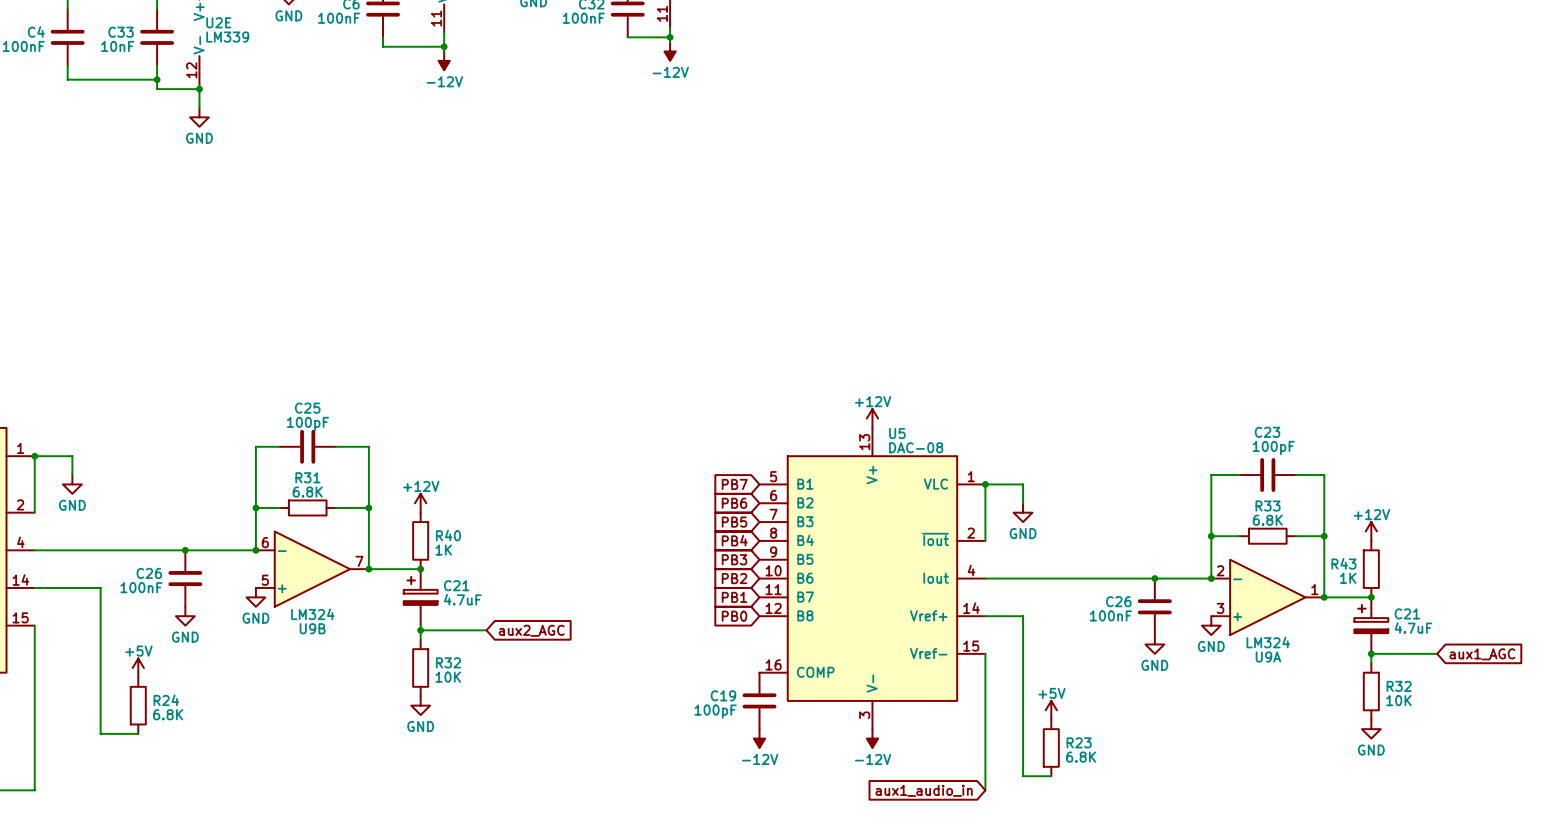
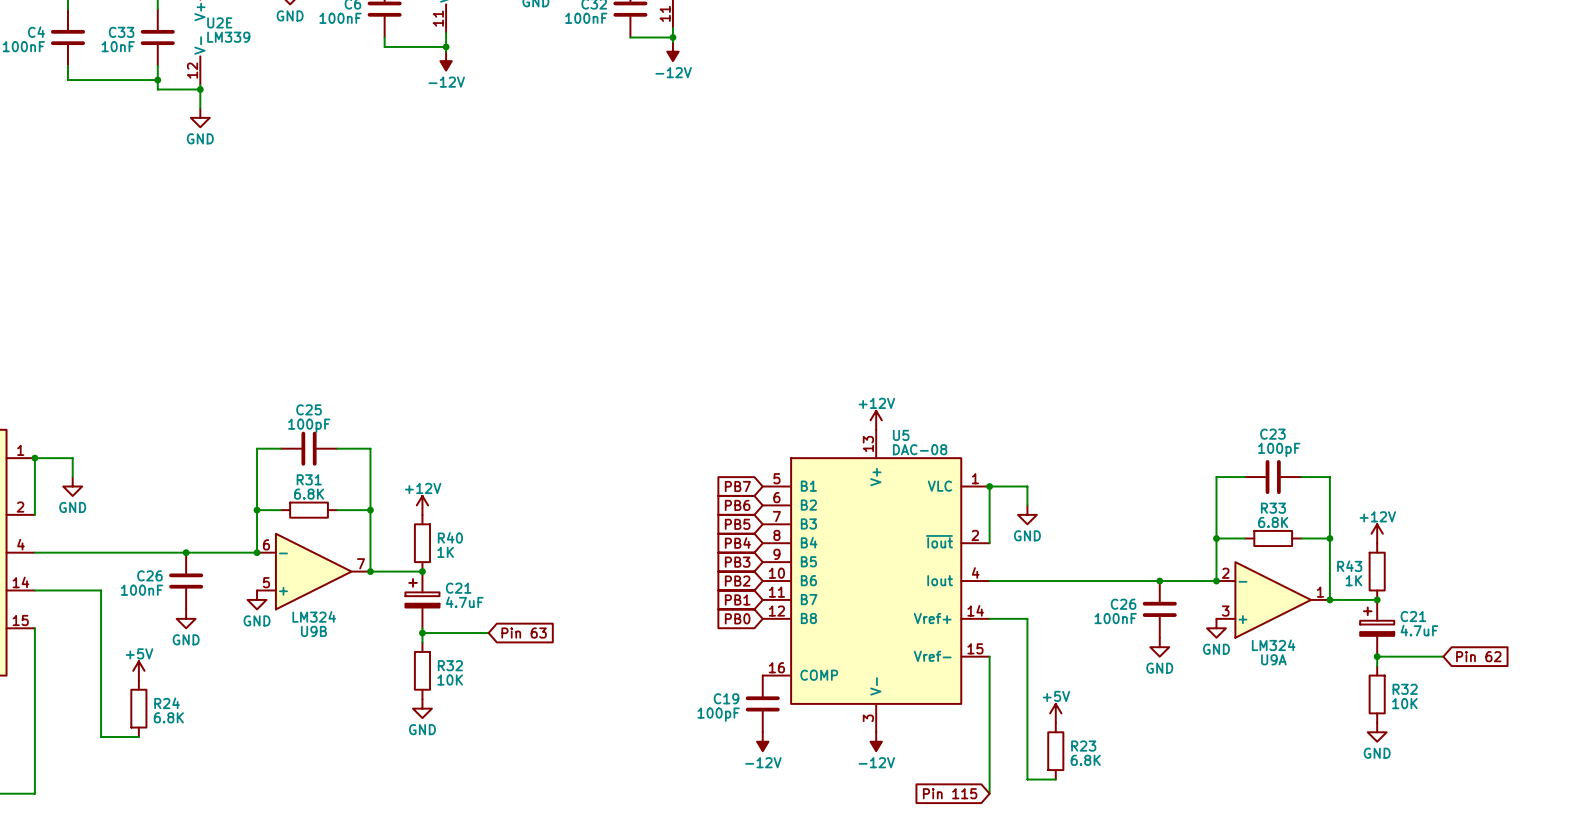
global label: aux2_AGC (531, 630) -> Pin 63 (524, 633)
global label: aux1_AGC (1482, 654) -> Pin 62 (1478, 656)
global label: aux1_audio_in (924, 790) -> Pin 115 (950, 793)

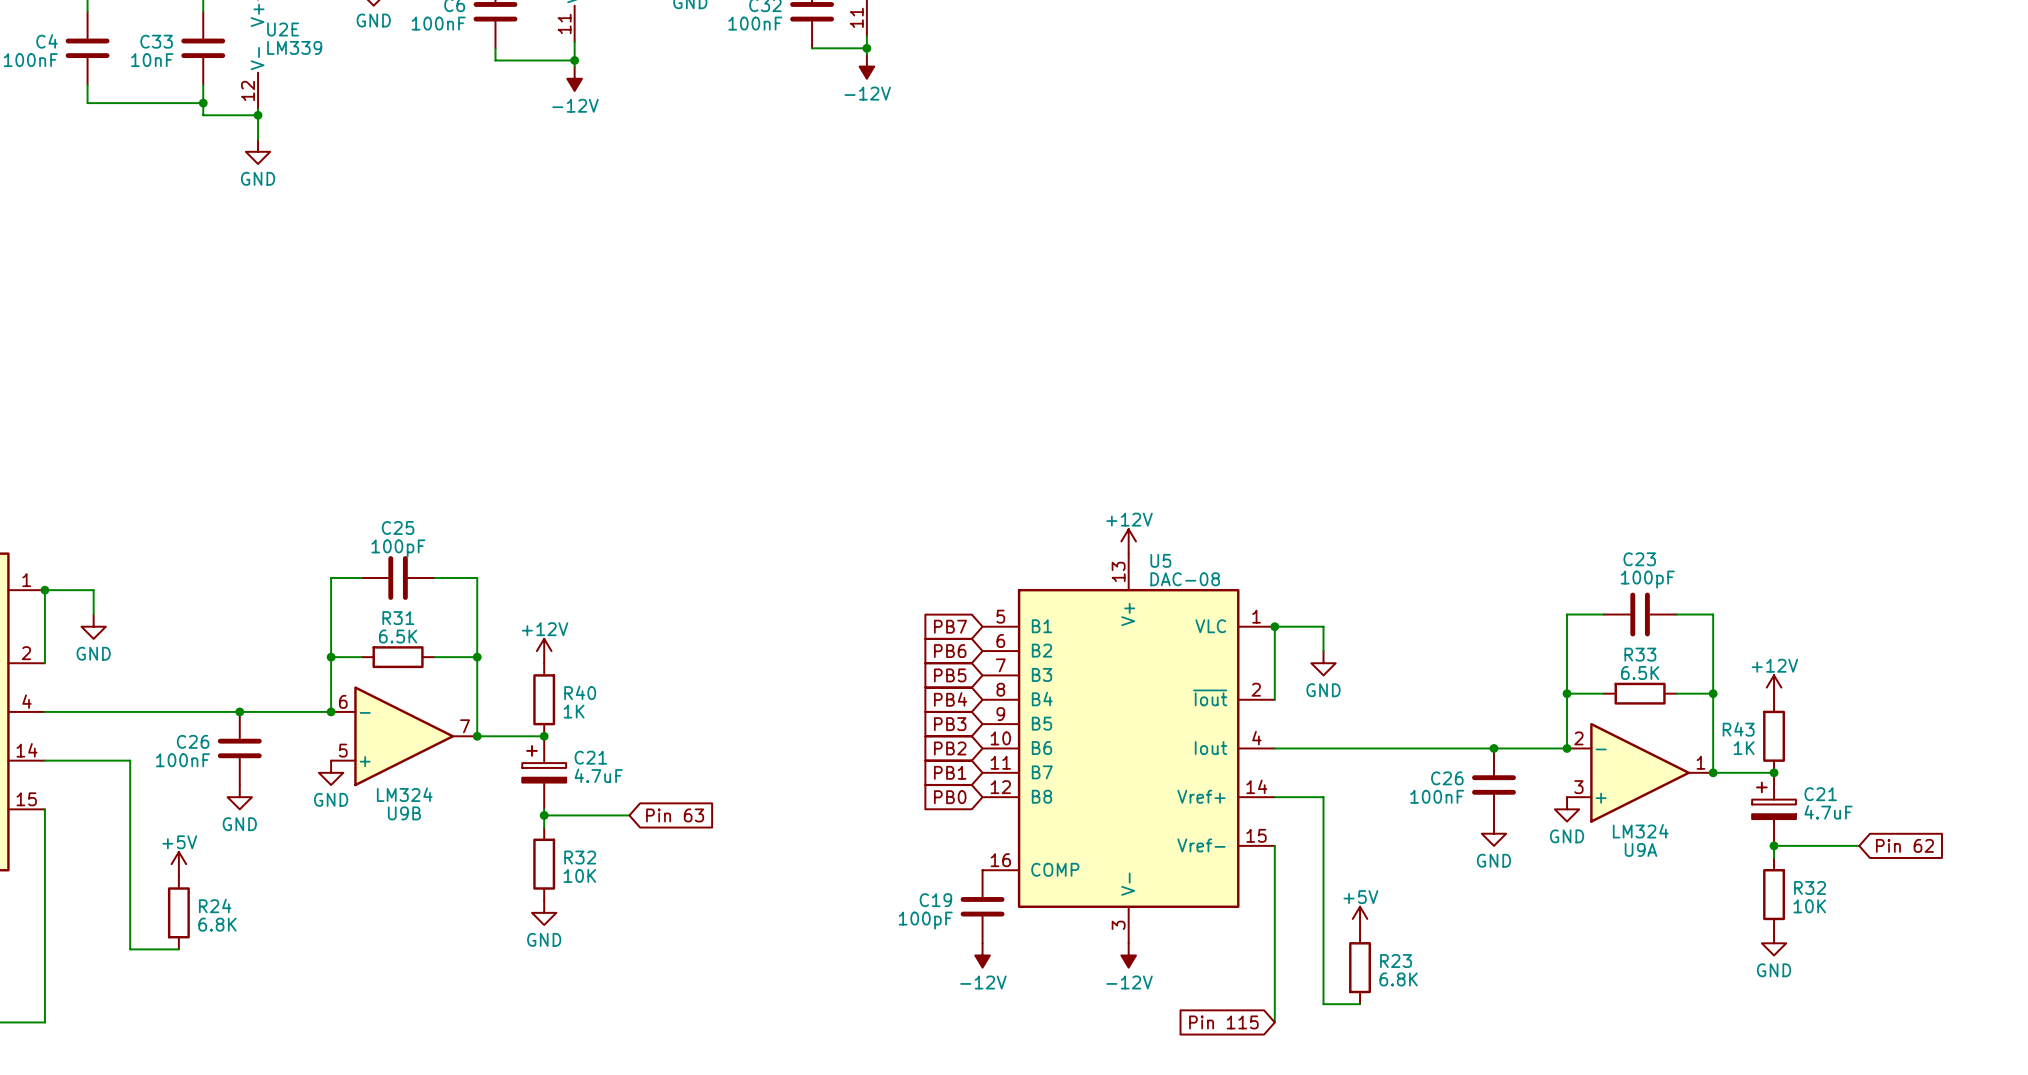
R31 value: 6.8K (309, 494) -> 6.5K (398, 636)
R33 value: 6.8K (1273, 522) -> 6.5K (1640, 673)

